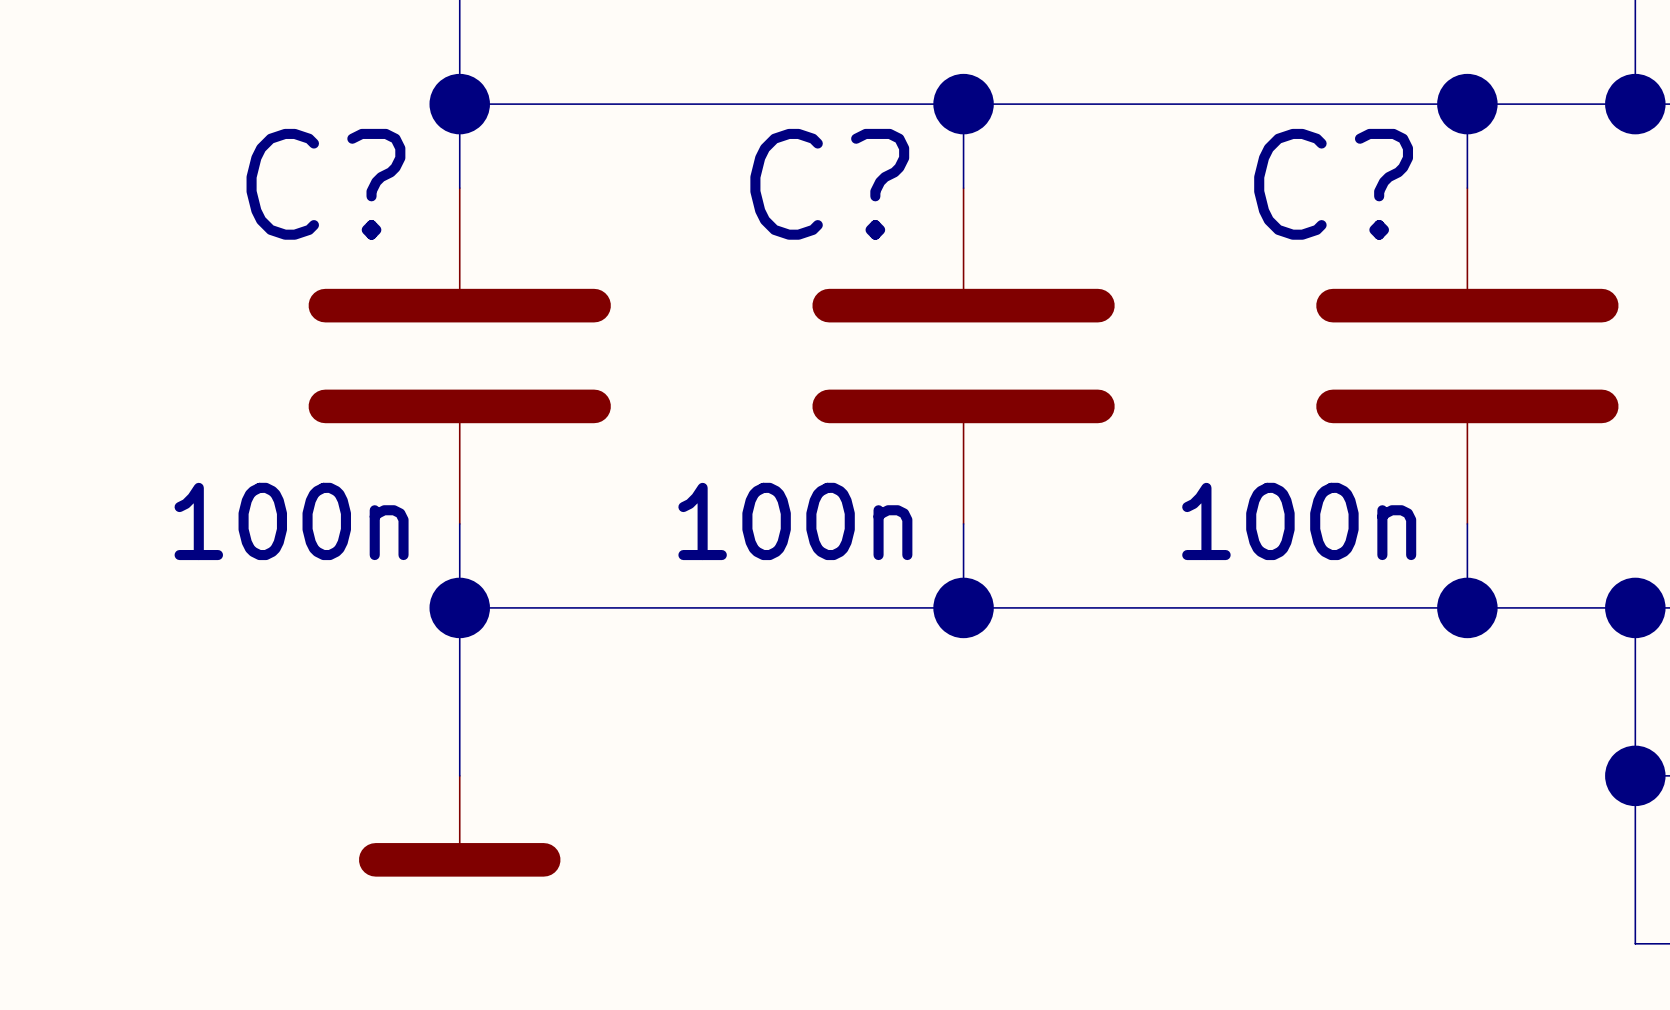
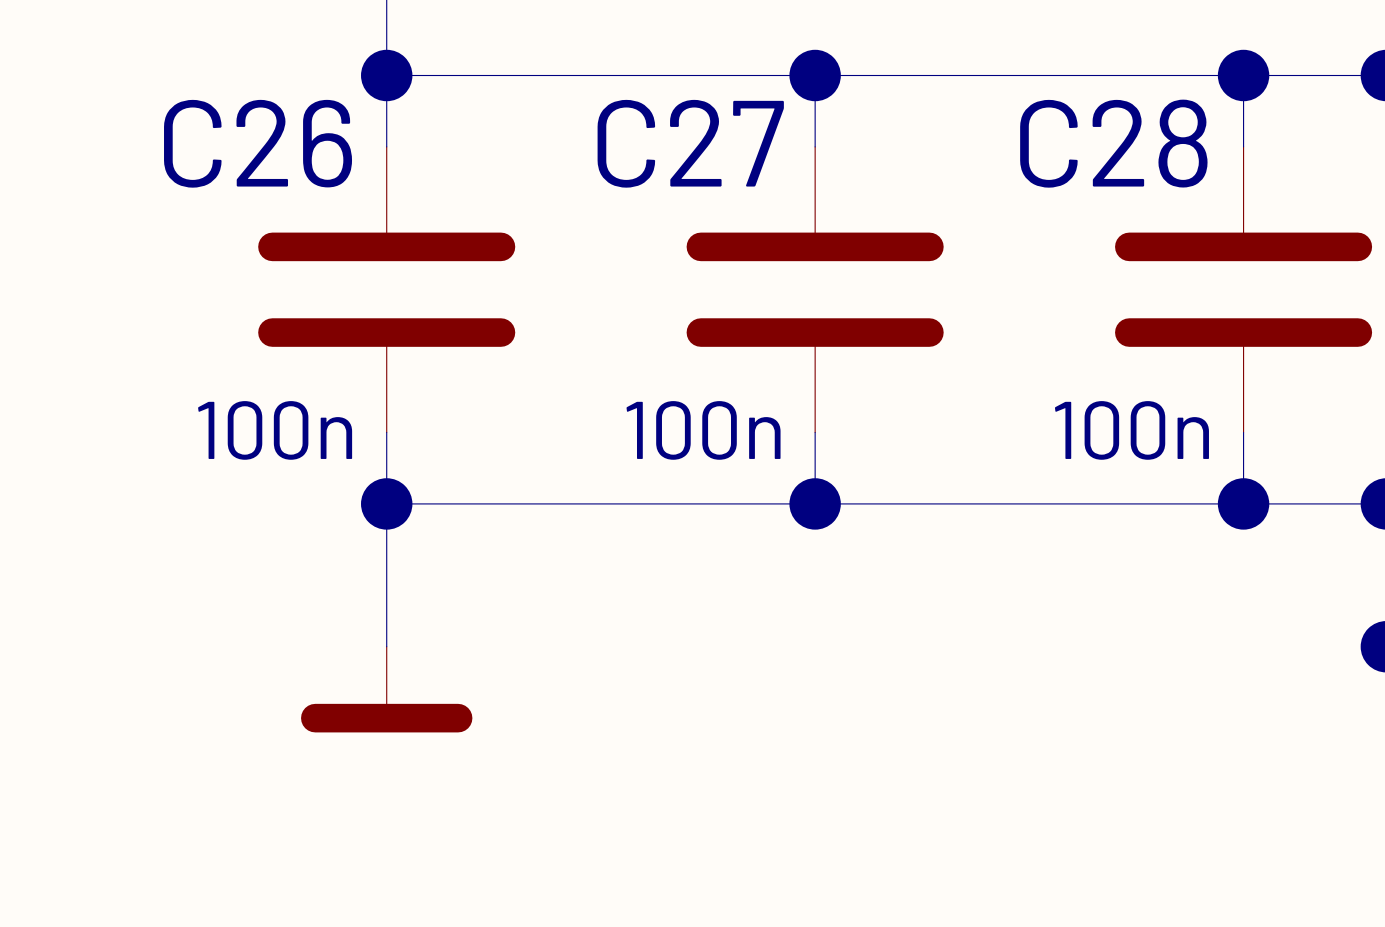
C? name: C? (325, 184) -> C26 (258, 143)
C? name: C? (829, 184) -> C27 (690, 143)
C? name: C? (1333, 184) -> C28 (1113, 143)

